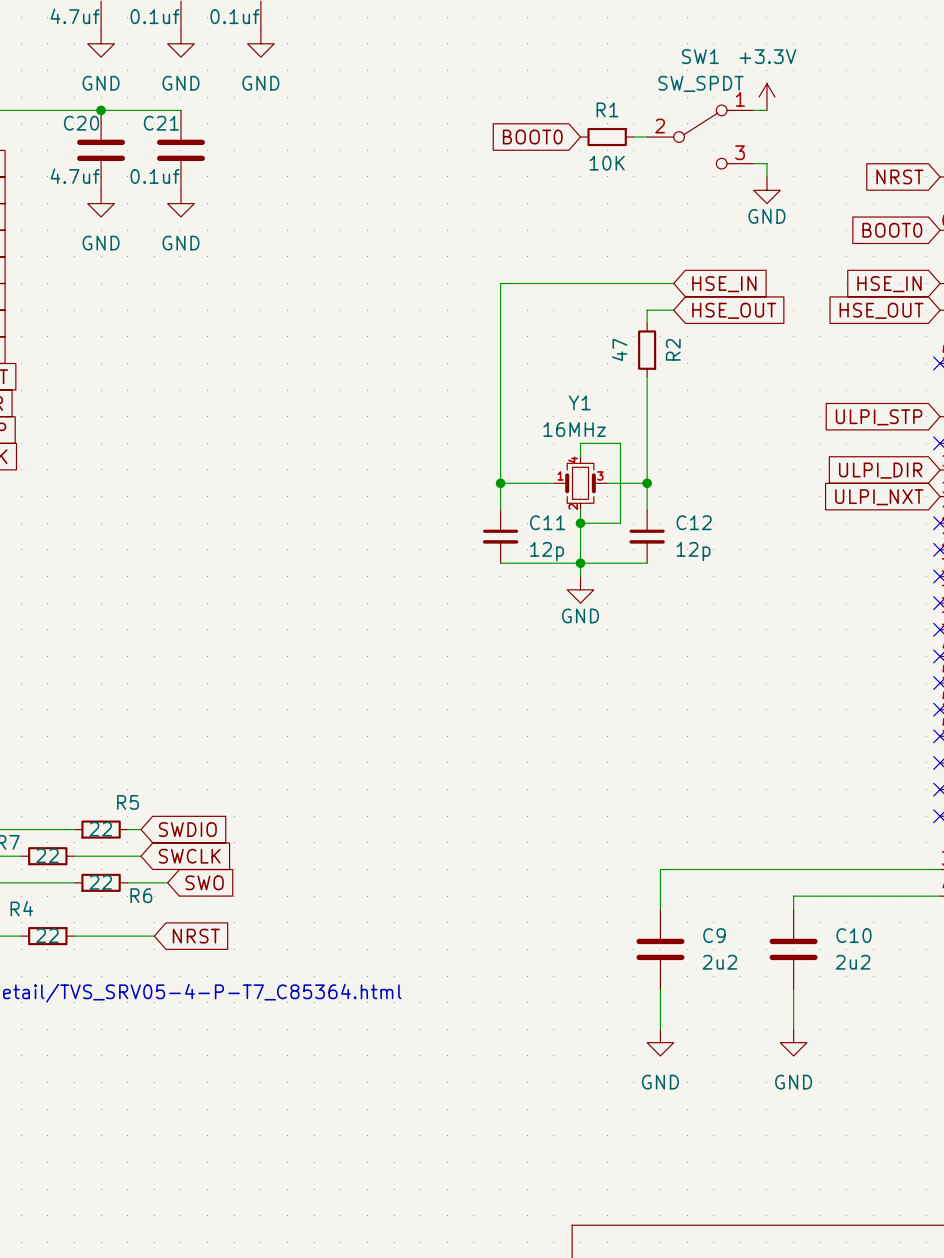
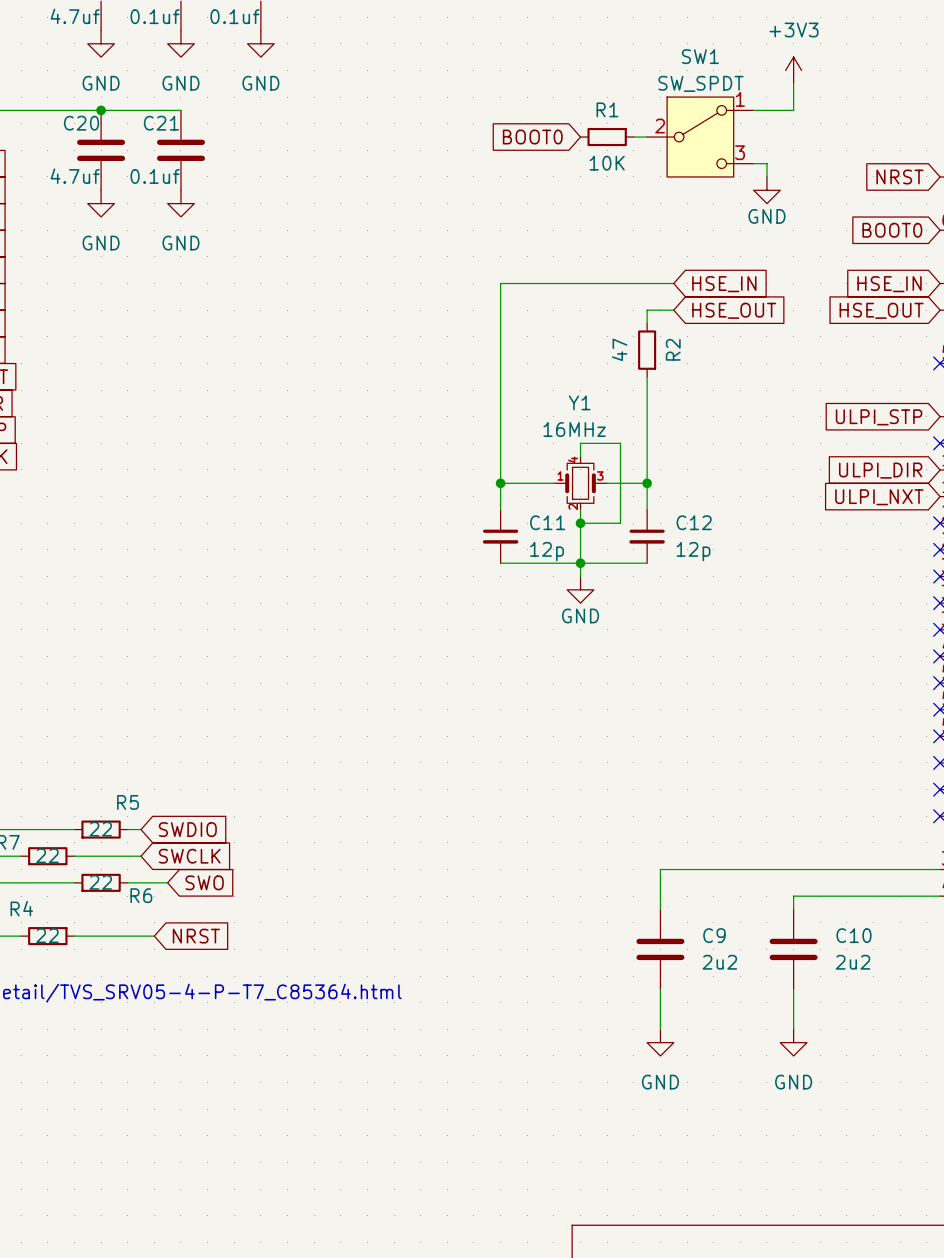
power symbol: none -> +3V3 (793, 70)
wire: none -> (793, 83) (793, 110) (766, 110)
power symbol: +3.3V (766, 97) -> none
SW1 symbol: [647, 105, 754, 169] -> [647, 97, 754, 177]

